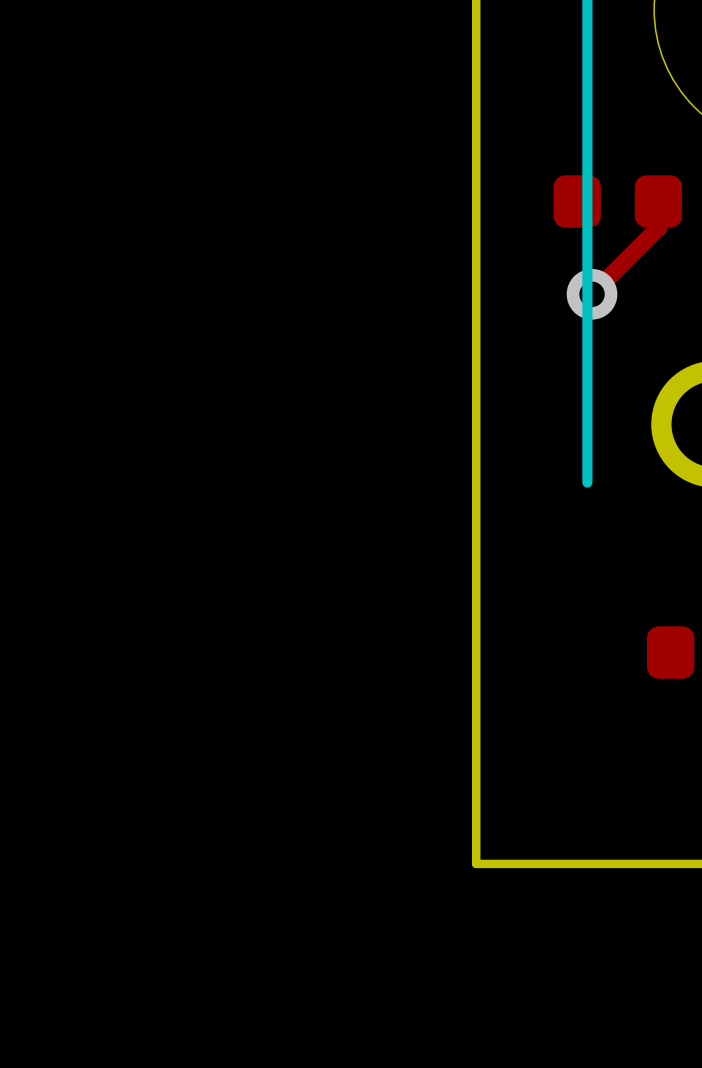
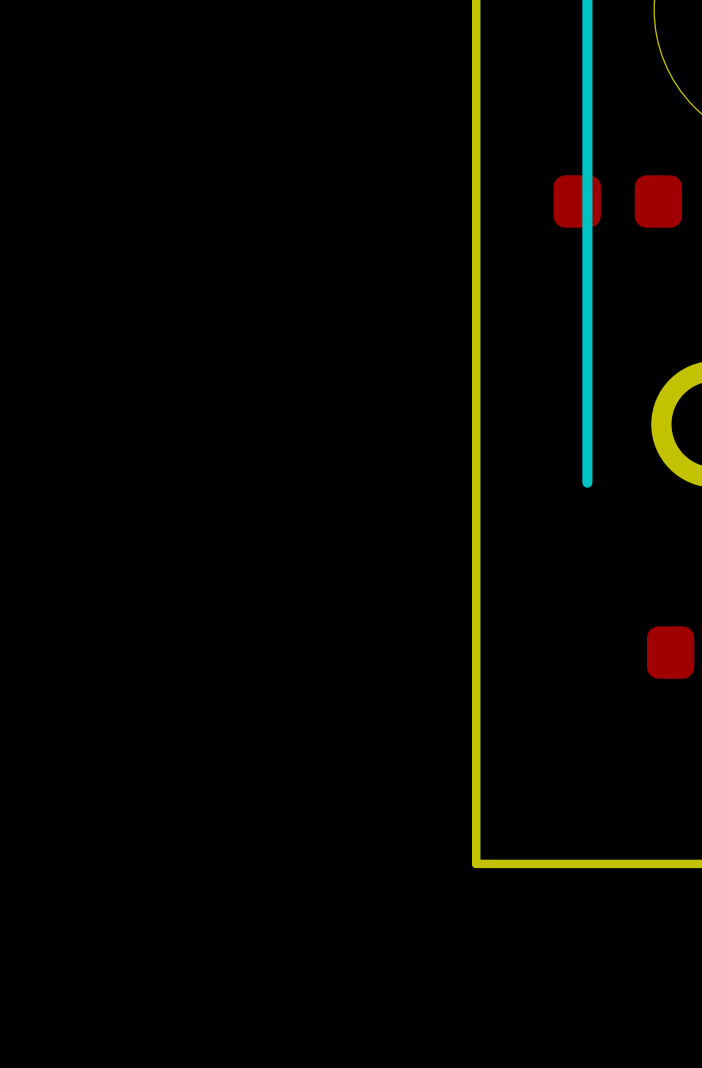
top track: (658, 201) (658, 227) (592, 294) -> none
via: (592, 294) -> none

